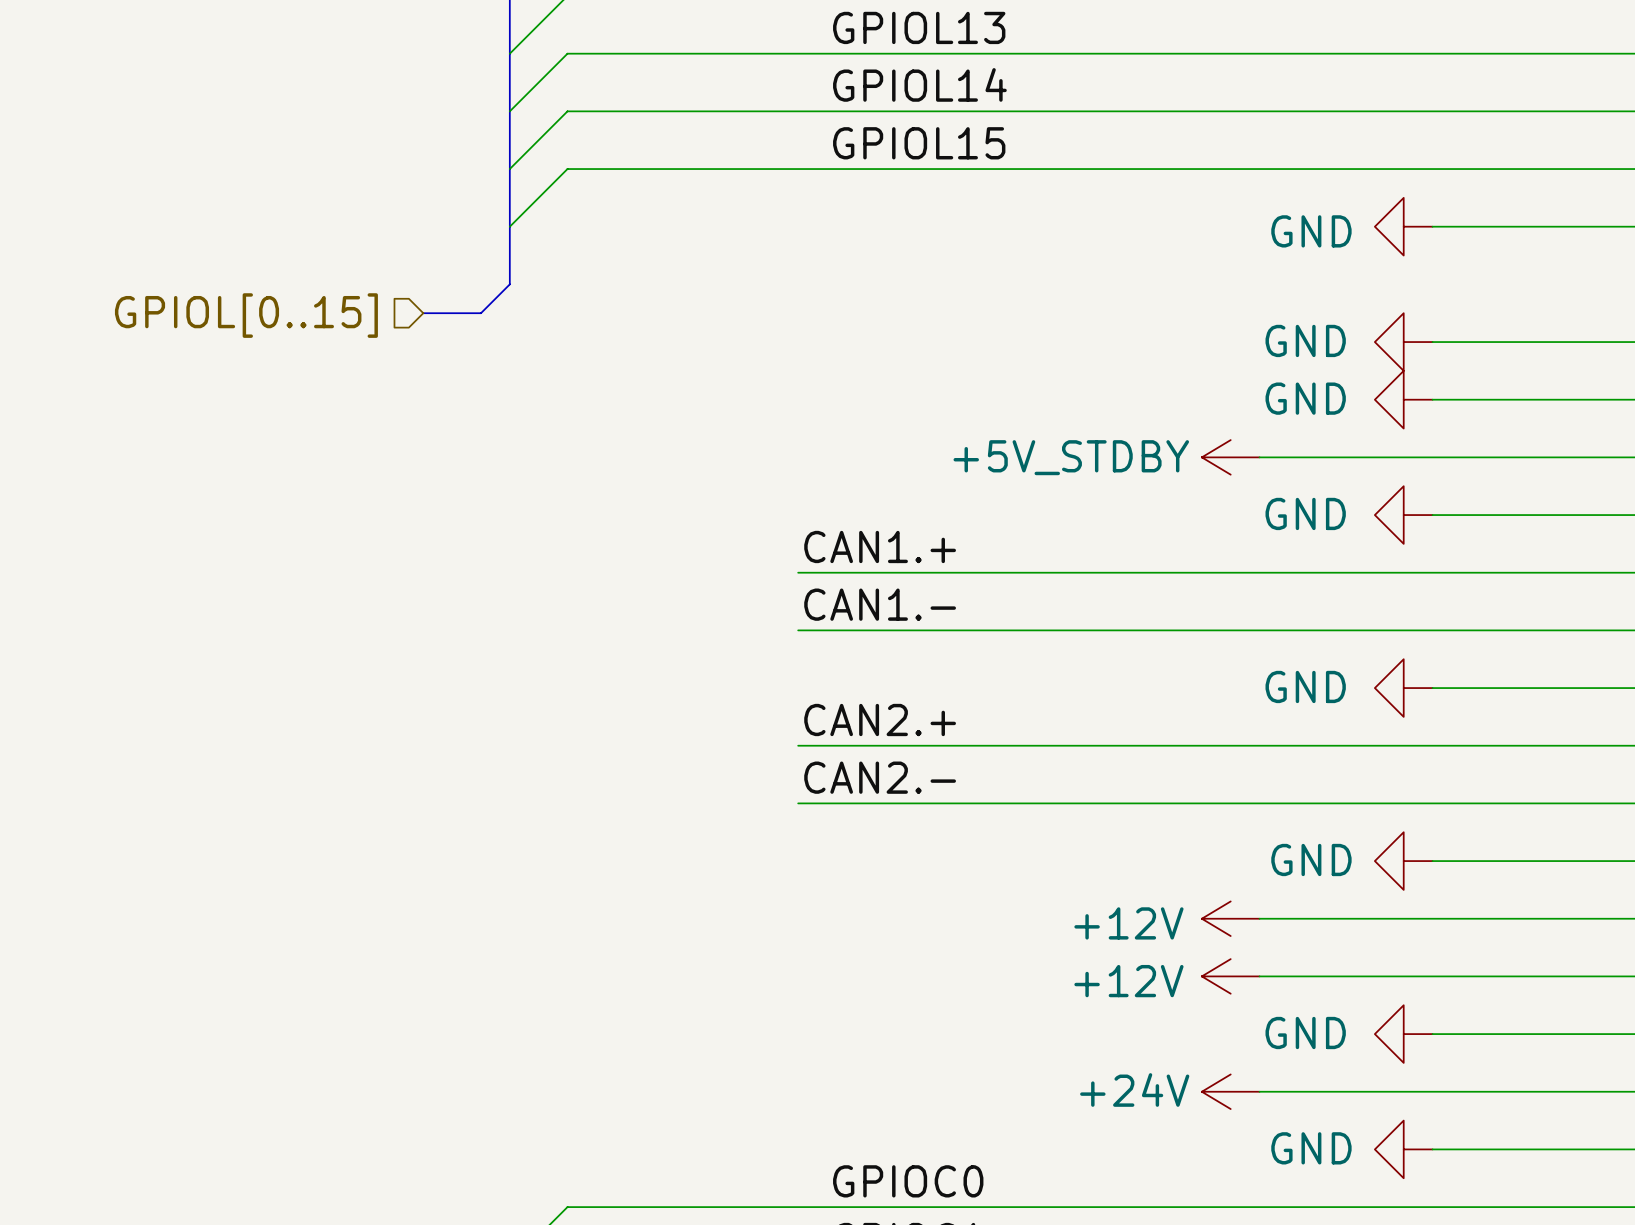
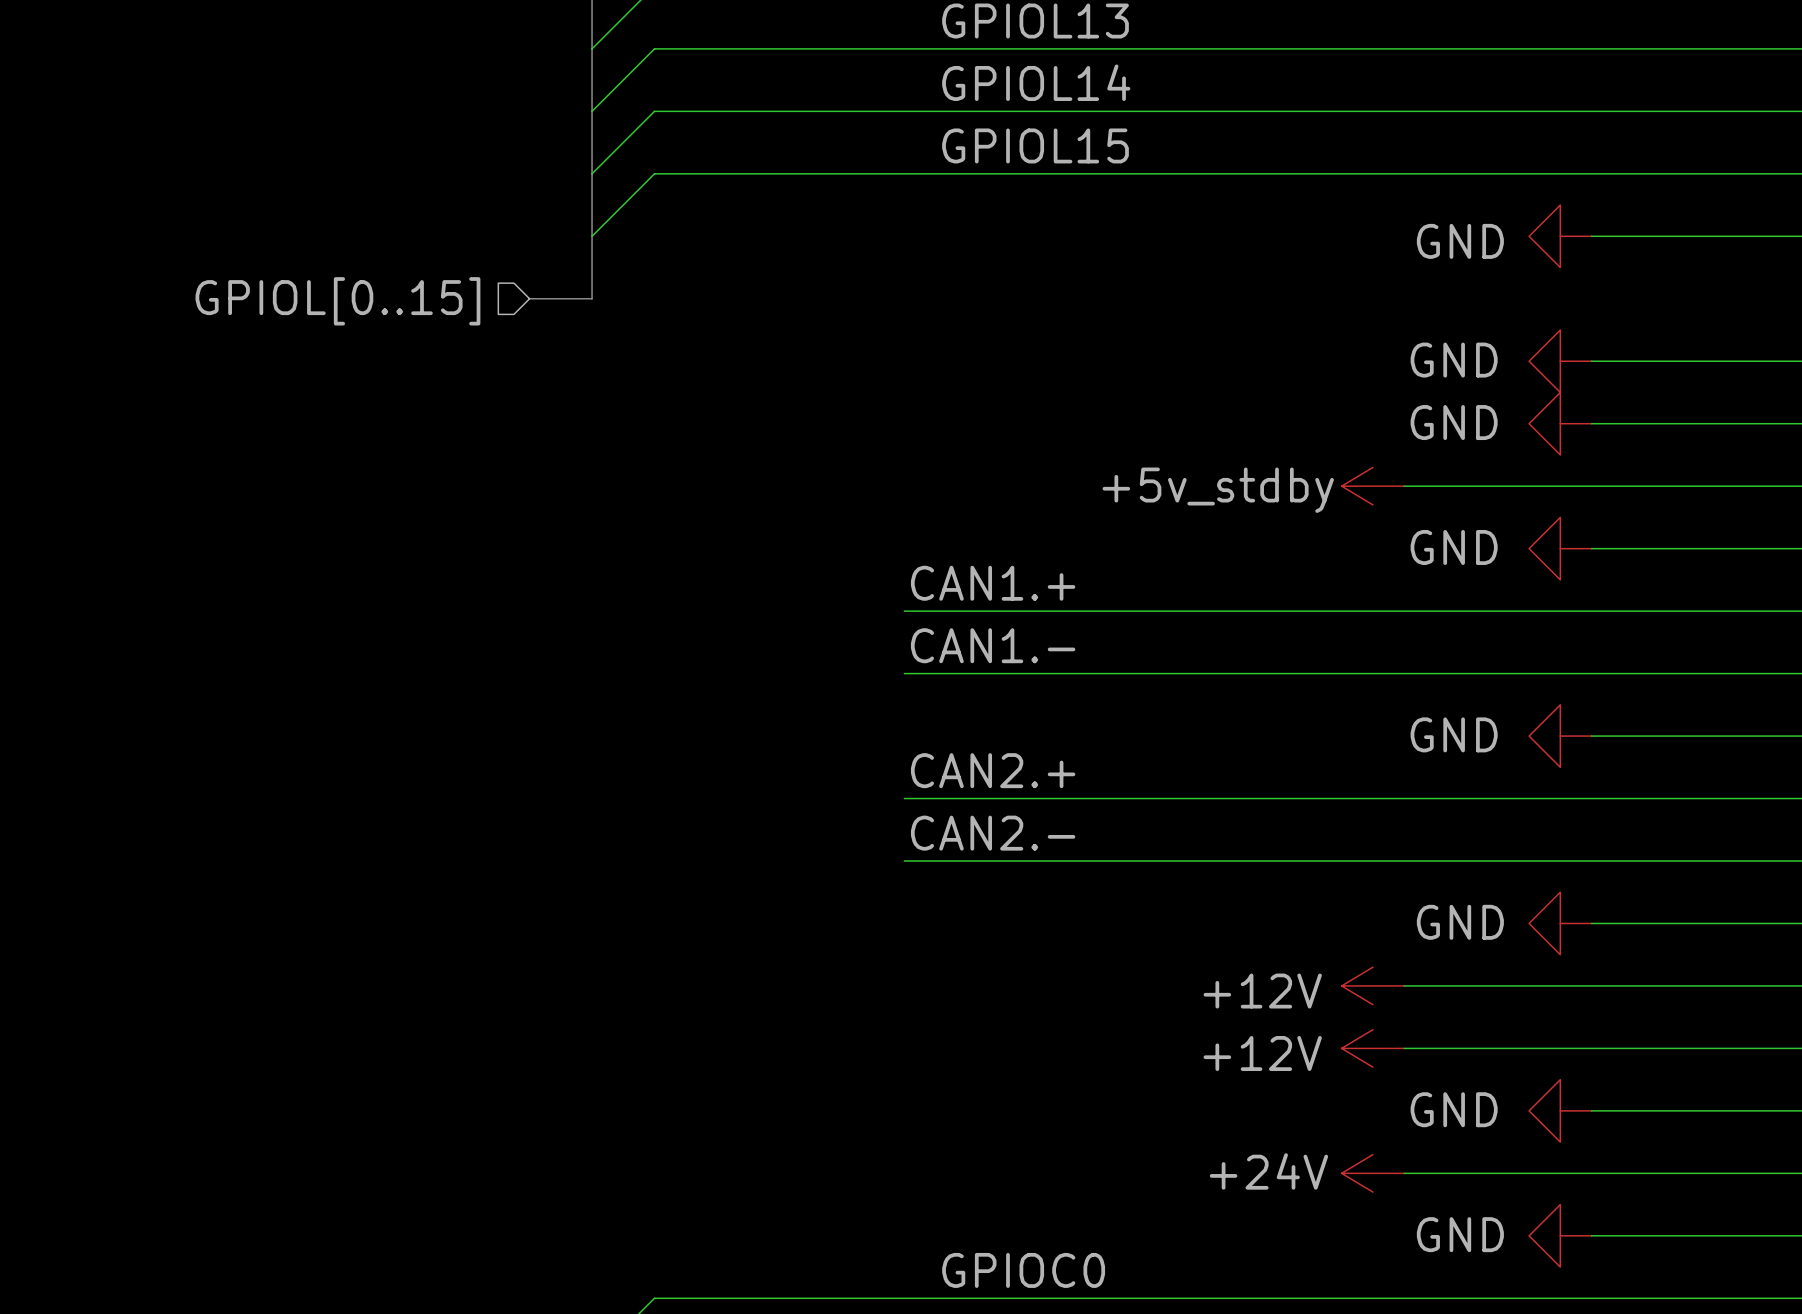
bus: (509, 284) (480, 313) (423, 313) -> (592, 298) (529, 298)
hierarchical label position: GPIOL[0..15] (246, 315) -> GPIOL[0..15] (337, 301)
power symbol: +5V_STDBY (1230, 457) -> +5v_stdby (1372, 486)

